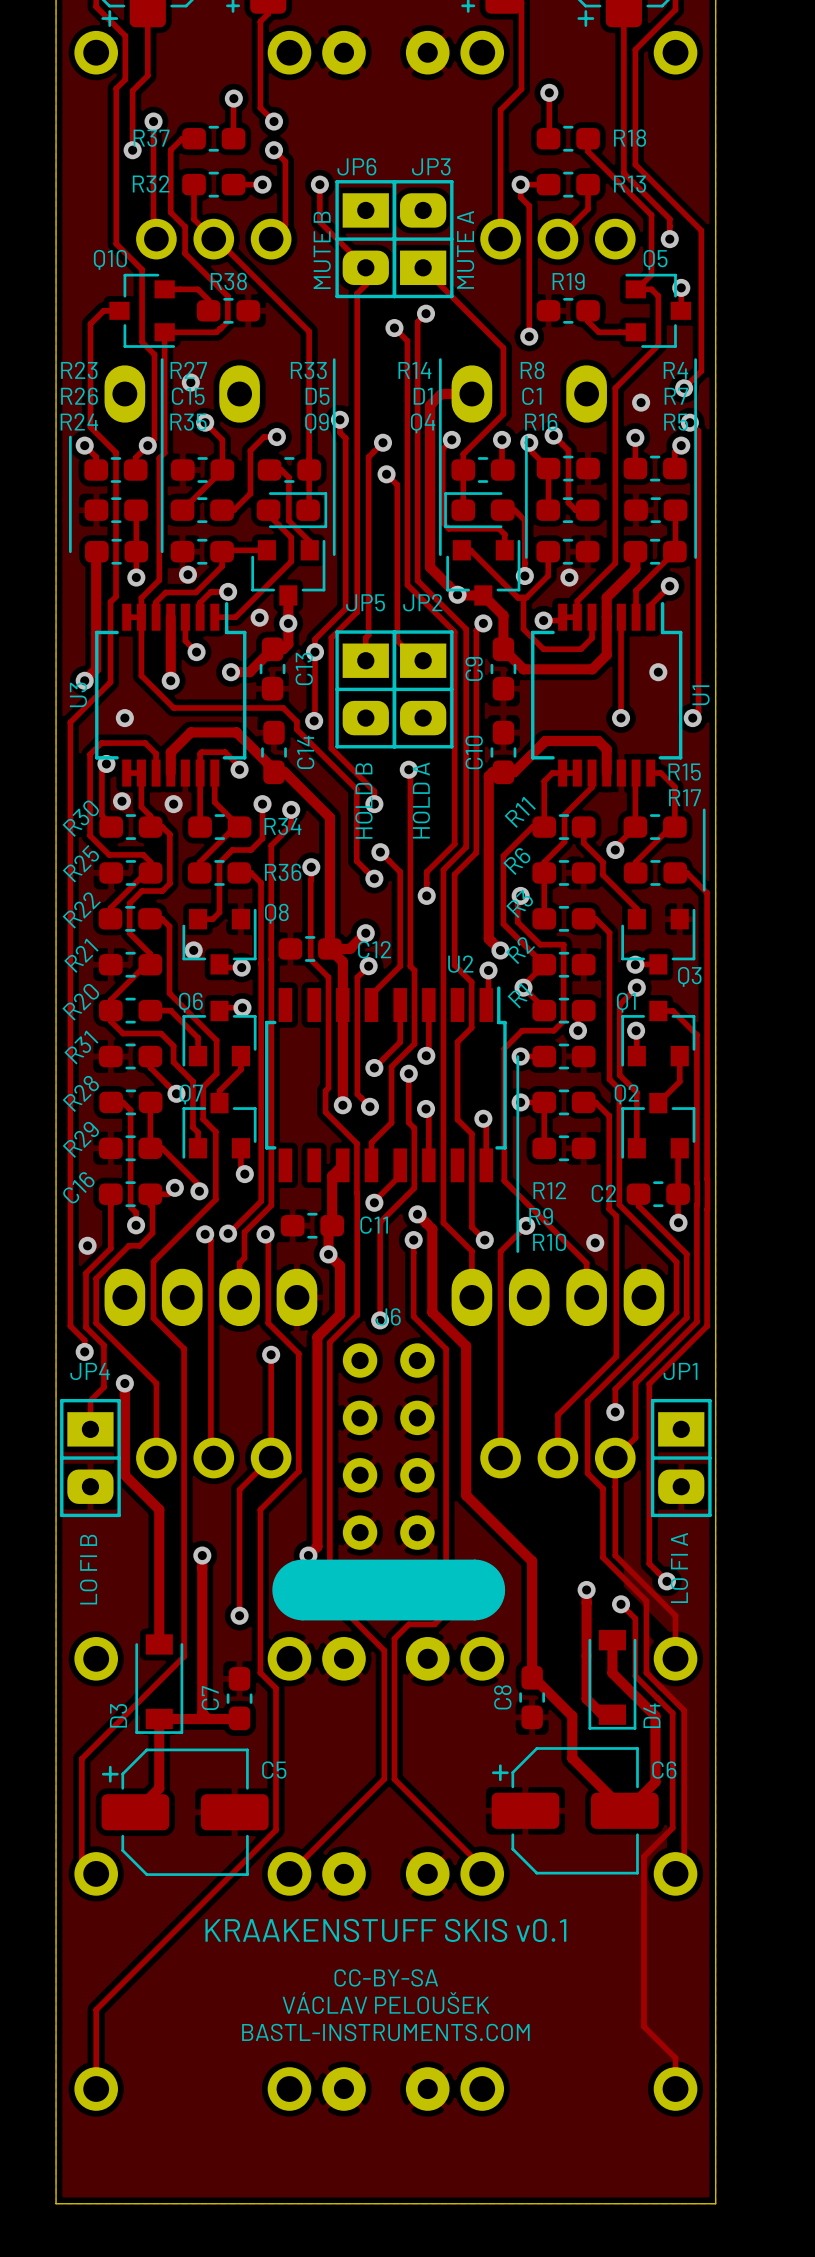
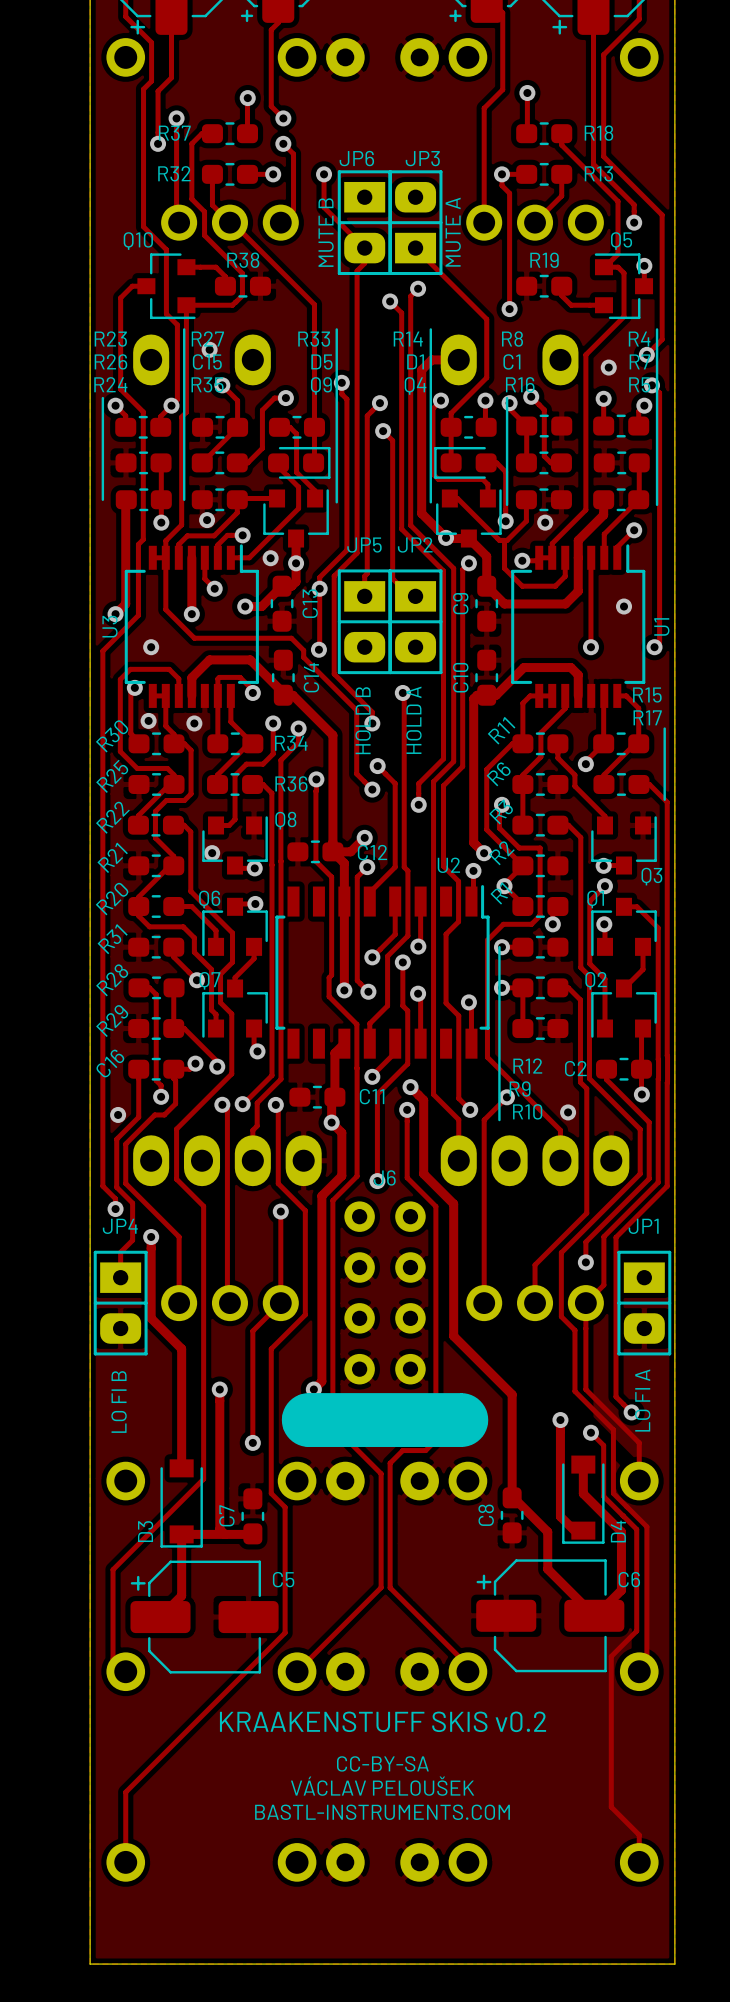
text: KRAAKENSTUFF SKIS v0.1 (385, 1930) -> KRAAKENSTUFF SKIS v0.2 (383, 1721)

